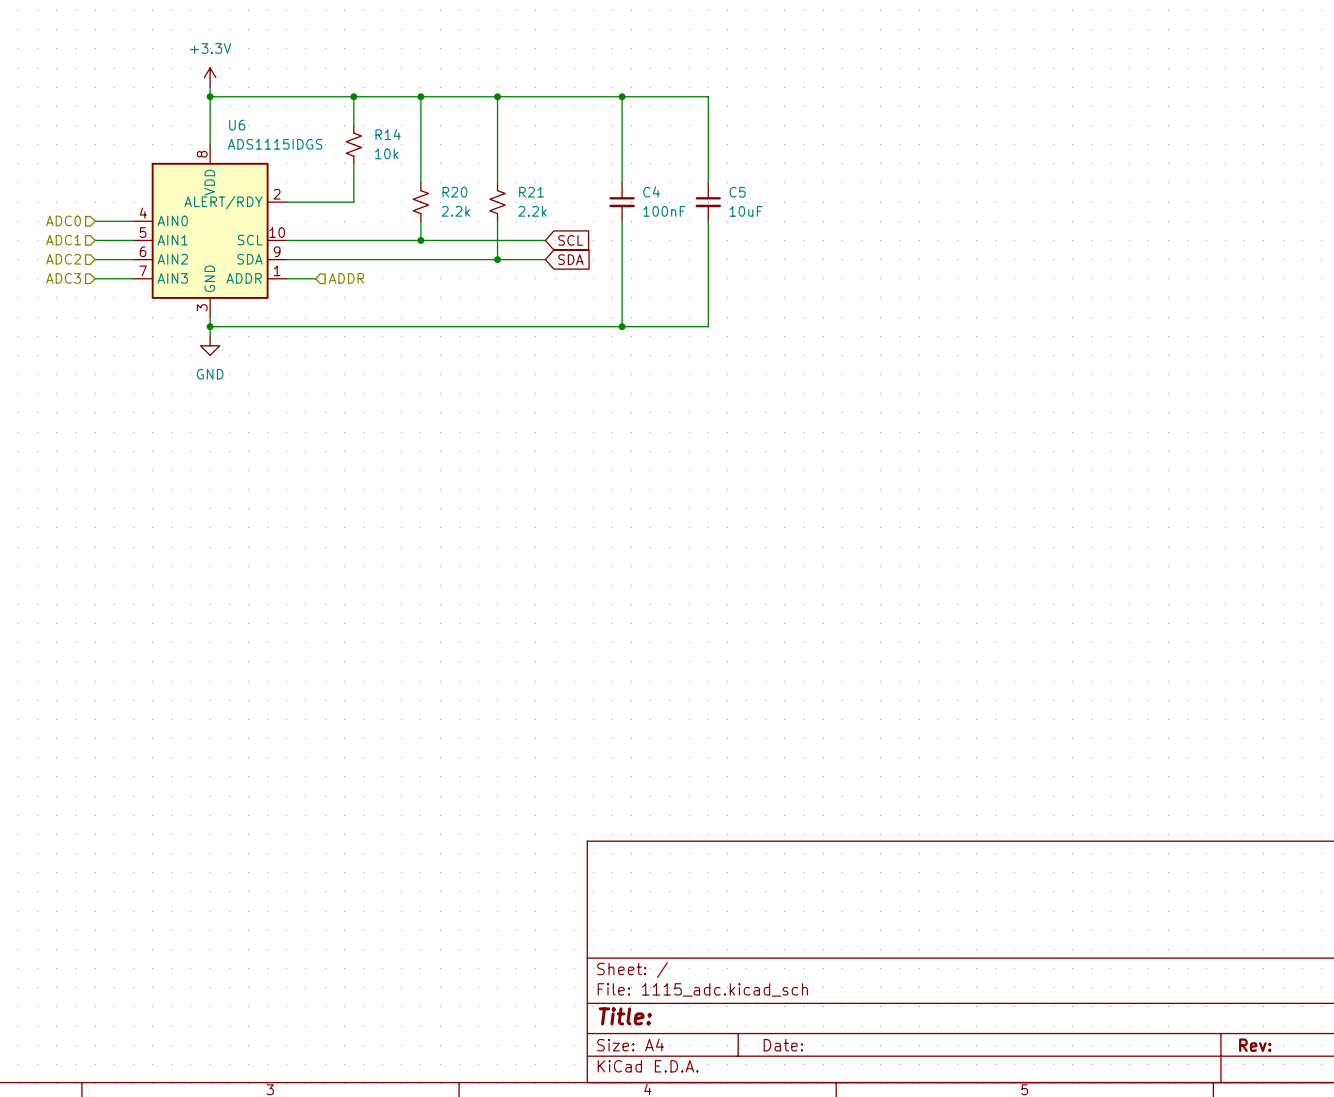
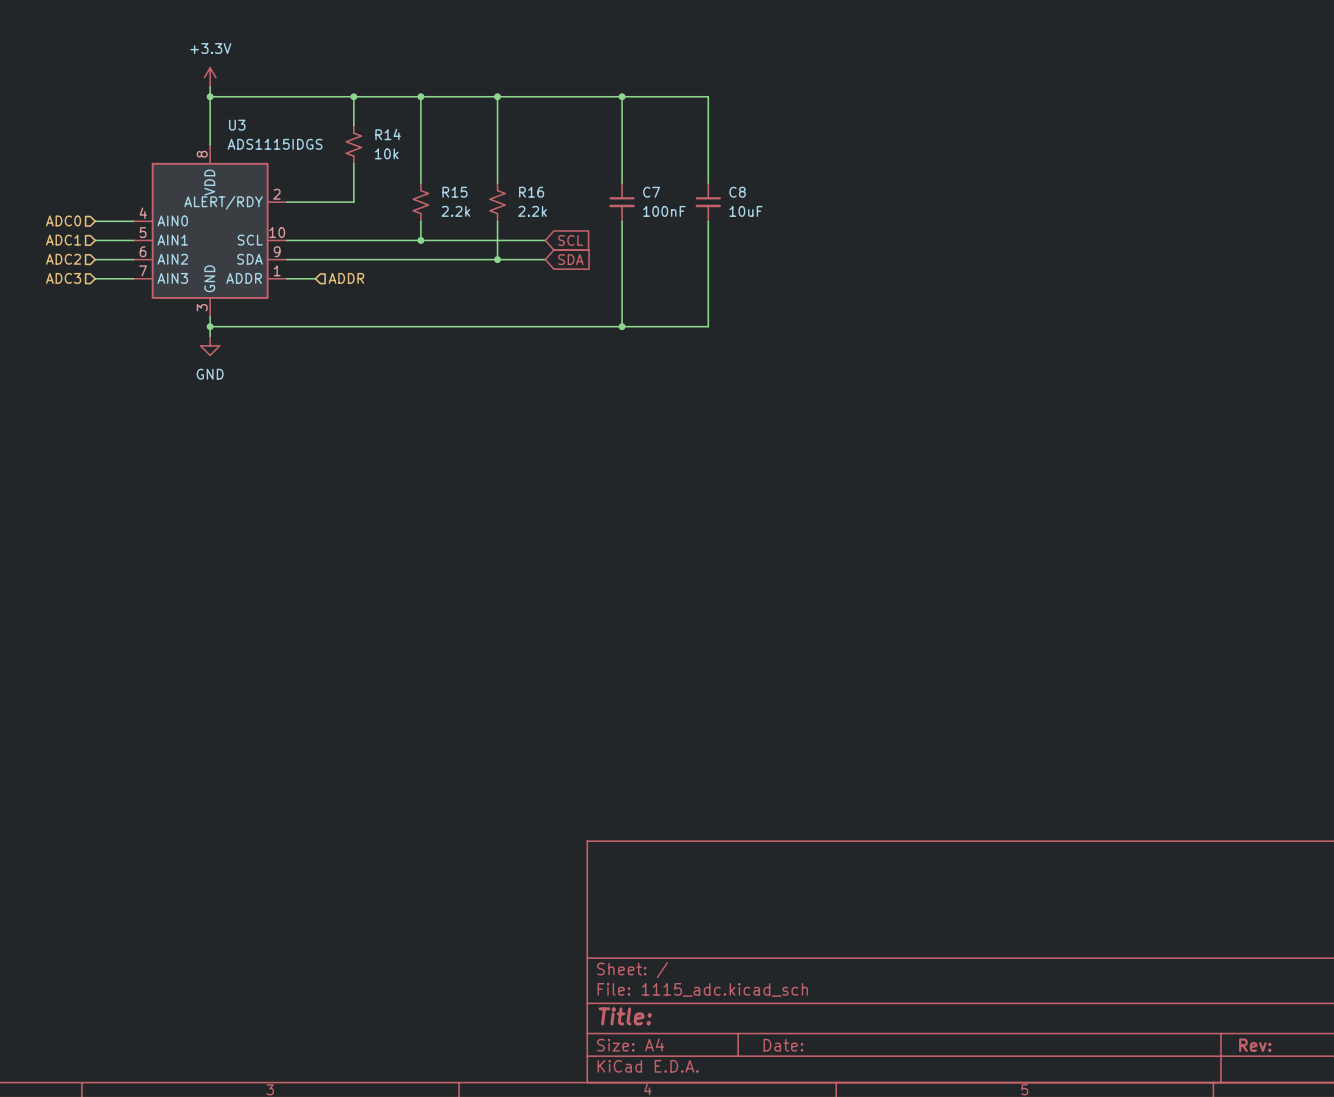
U6 name: U6 (237, 125) -> U3 (237, 125)
R20 name: R20 (454, 192) -> R15 (454, 192)
R21 name: R21 (531, 192) -> R16 (531, 192)
C4 name: C4 (651, 192) -> C7 (651, 192)
C5 name: C5 (737, 192) -> C8 (737, 192)

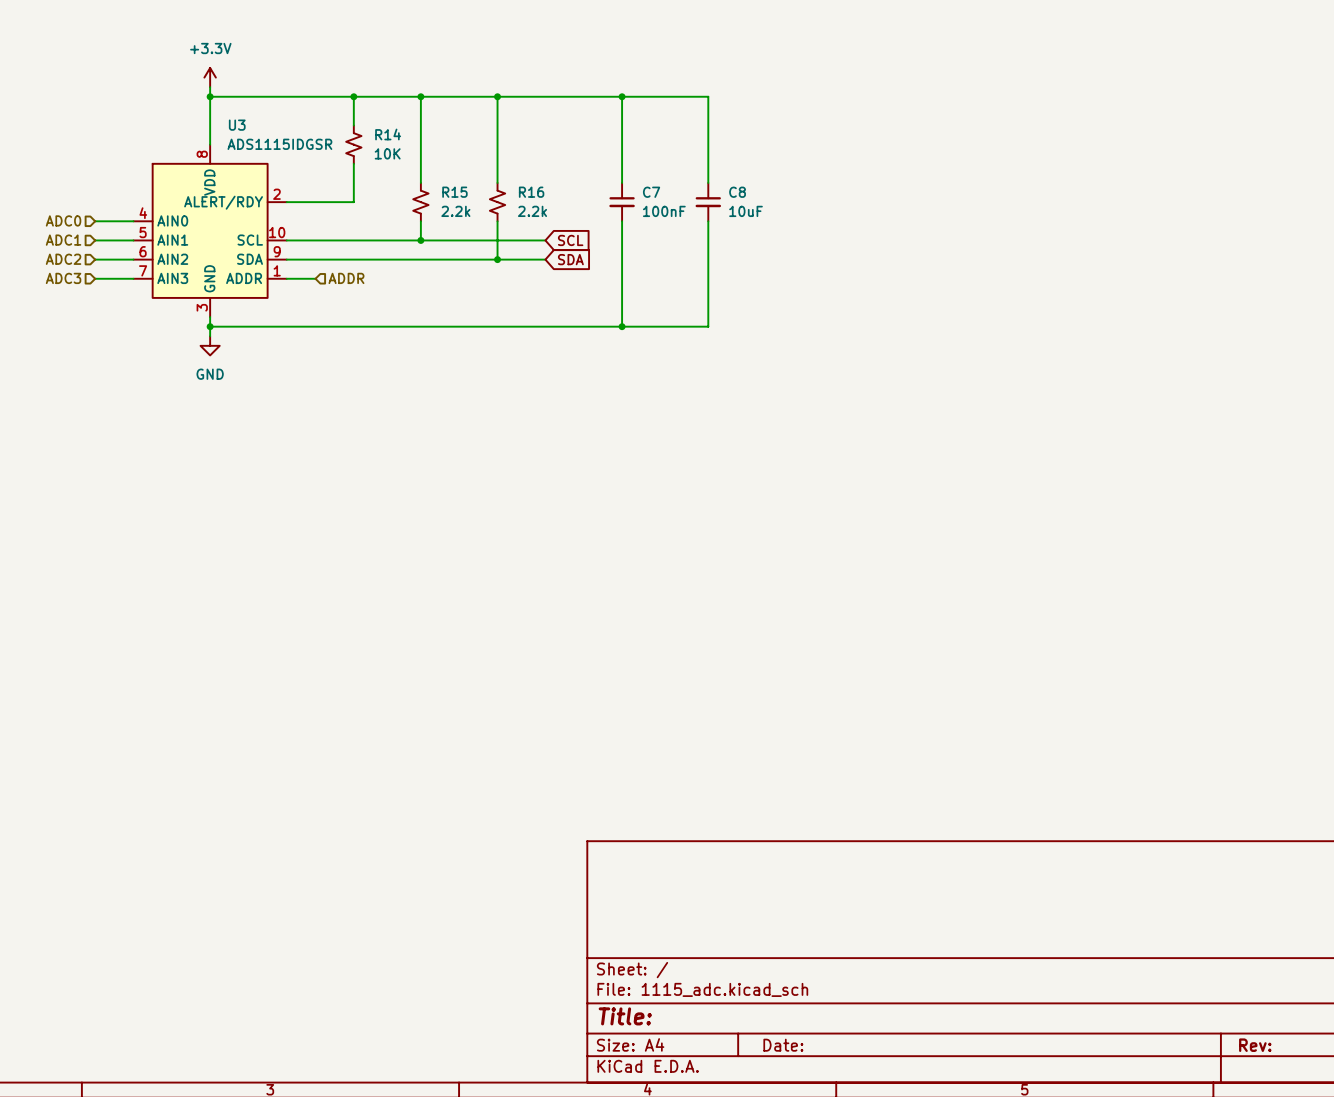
U3 value: ADS1115IDGS (275, 144) -> ADS1115IDGSR (279, 144)
R14 value: 10k (386, 153) -> 10K (387, 153)

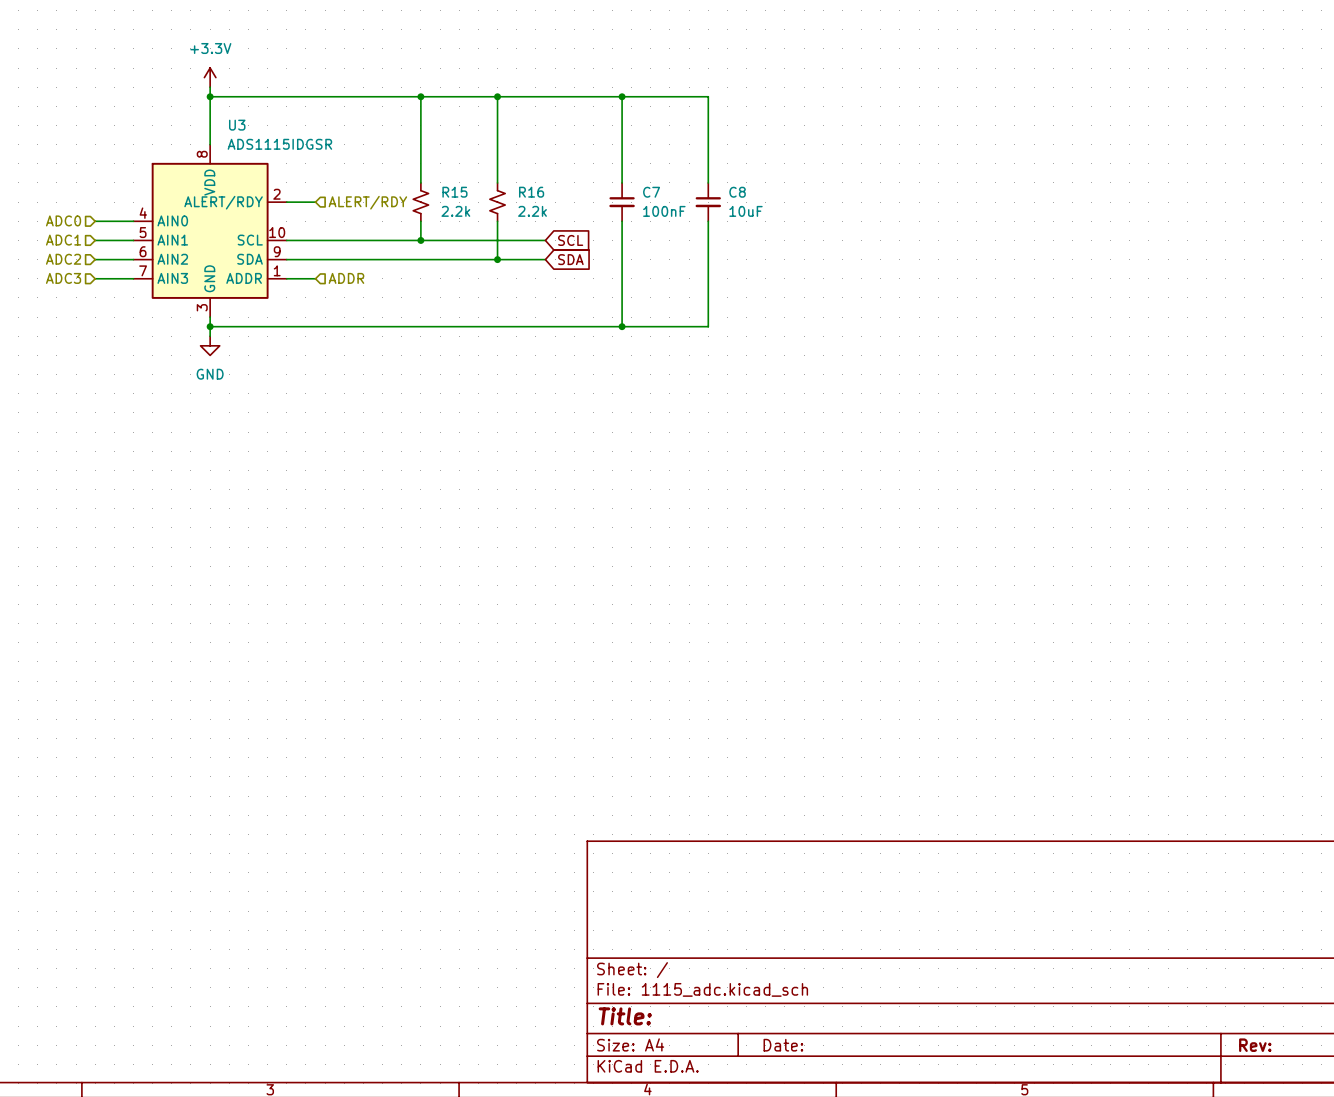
wire: (353, 96) (353, 125) -> none
junction: (353, 96) -> none
R14: 10K (353, 144) -> none
wire: (353, 163) (353, 202) (315, 202) -> none
hierarchical label: none -> ALERT/RDY (367, 202)

